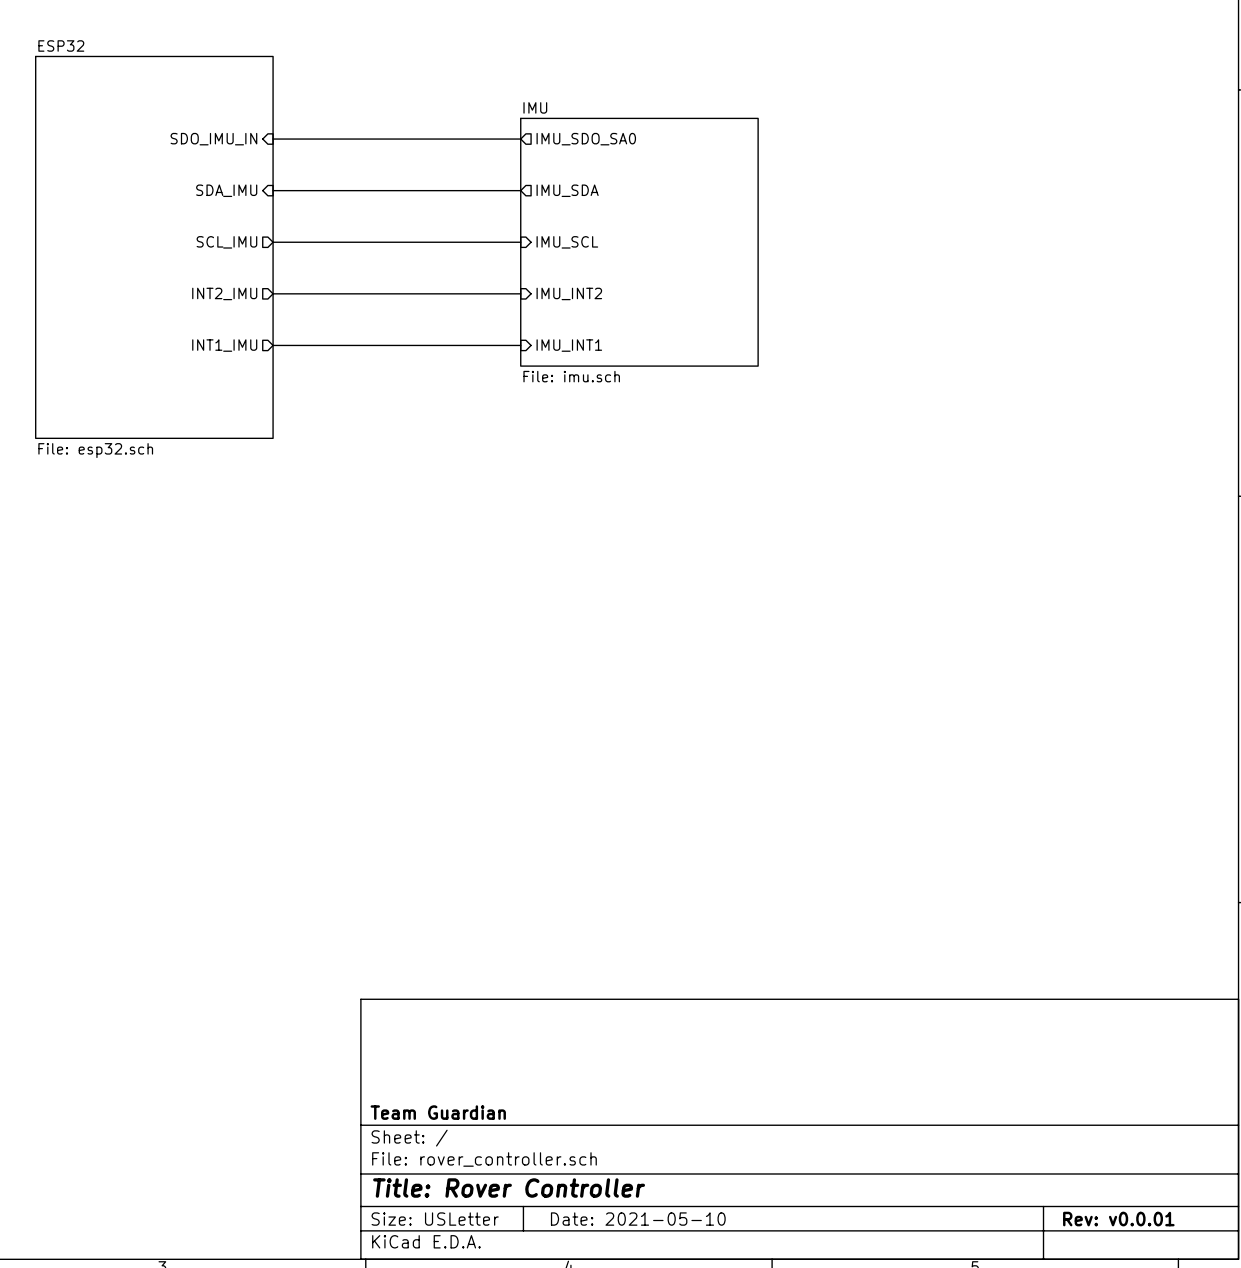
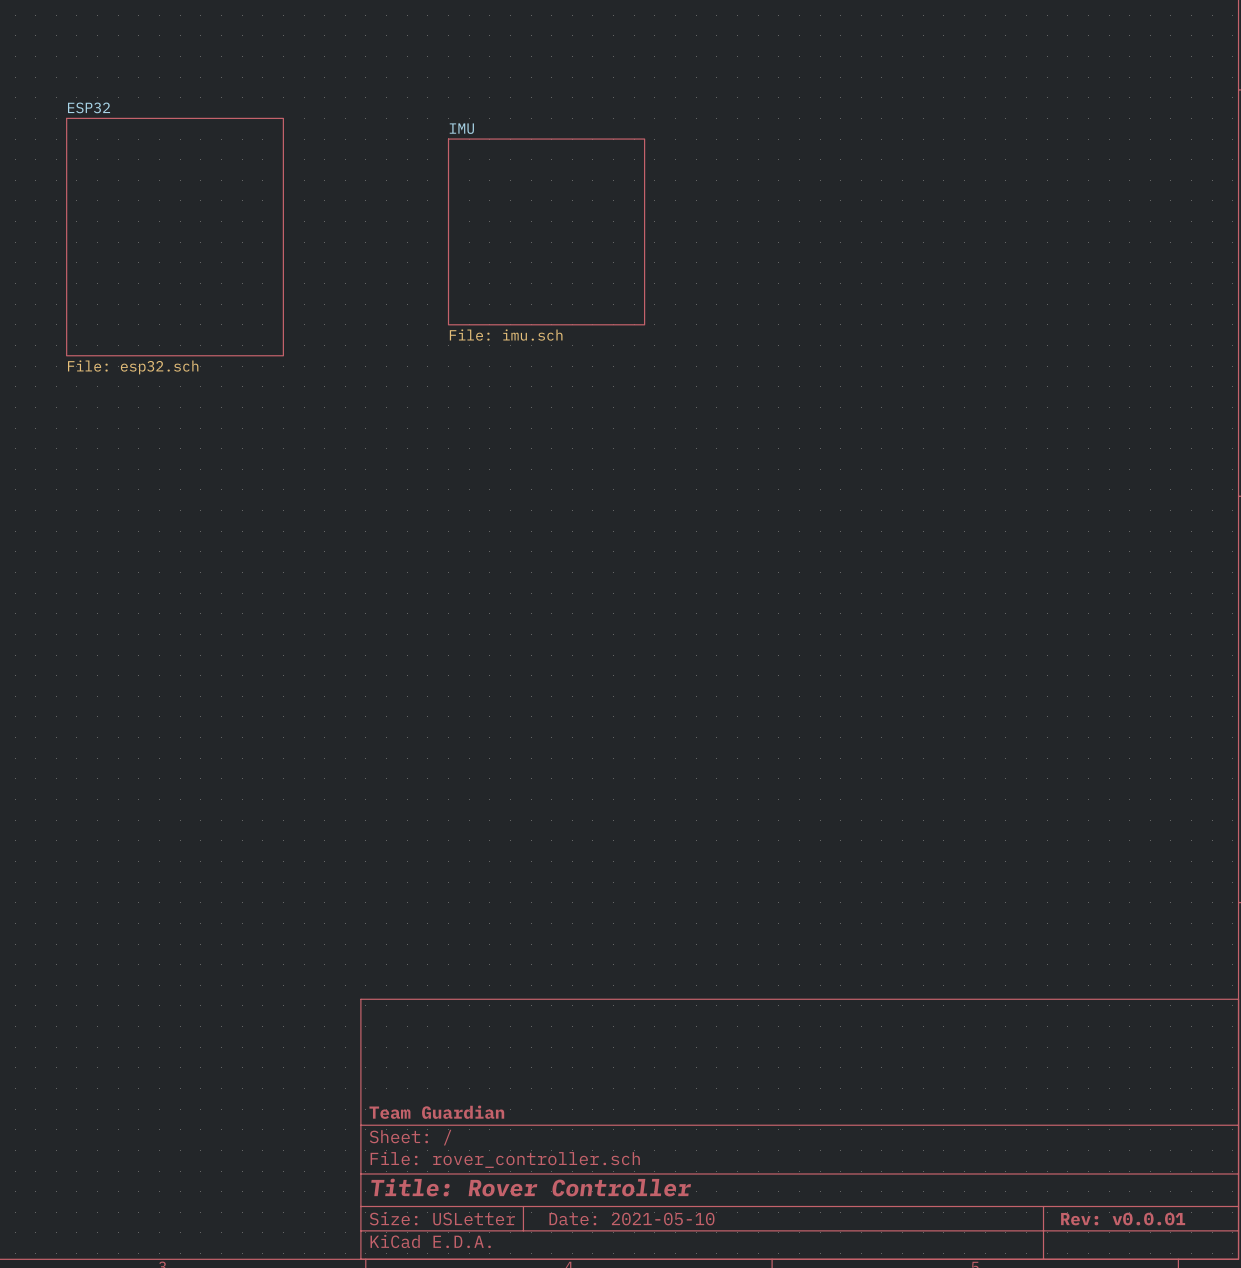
sheet ESP32 name position: ESP32 (61, 45) -> ESP32 (89, 107)
sheet ESP32 shape: [35, 56, 274, 439] -> [66, 118, 284, 356]
sheet pin: SDO_IMU_IN (213, 139) -> none
wire: (273, 139) (520, 139) -> none
sheet pin: IMU_SDO_SA0 (586, 139) -> none
sheet pin: SDA_IMU (226, 190) -> none
wire: (273, 190) (520, 190) -> none
sheet pin: IMU_SDA (567, 190) -> none
sheet IMU: none -> File: imu.sch (546, 231)
sheet pin: SCL_IMU (226, 242) -> none
wire: (273, 242) (520, 242) -> none
sheet pin: IMU_SCL (567, 242) -> none
sheet IMU: File: imu.sch (639, 242) -> none
sheet pin: INT2_IMU (224, 293) -> none
wire: (273, 293) (520, 293) -> none
sheet pin: IMU_INT2 (569, 293) -> none
sheet pin: INT1_IMU (224, 345) -> none
wire: (273, 345) (520, 345) -> none
sheet pin: IMU_INT1 (569, 345) -> none
sheet ESP32 value position: File: esp32.sch (95, 450) -> File: esp32.sch (133, 367)

